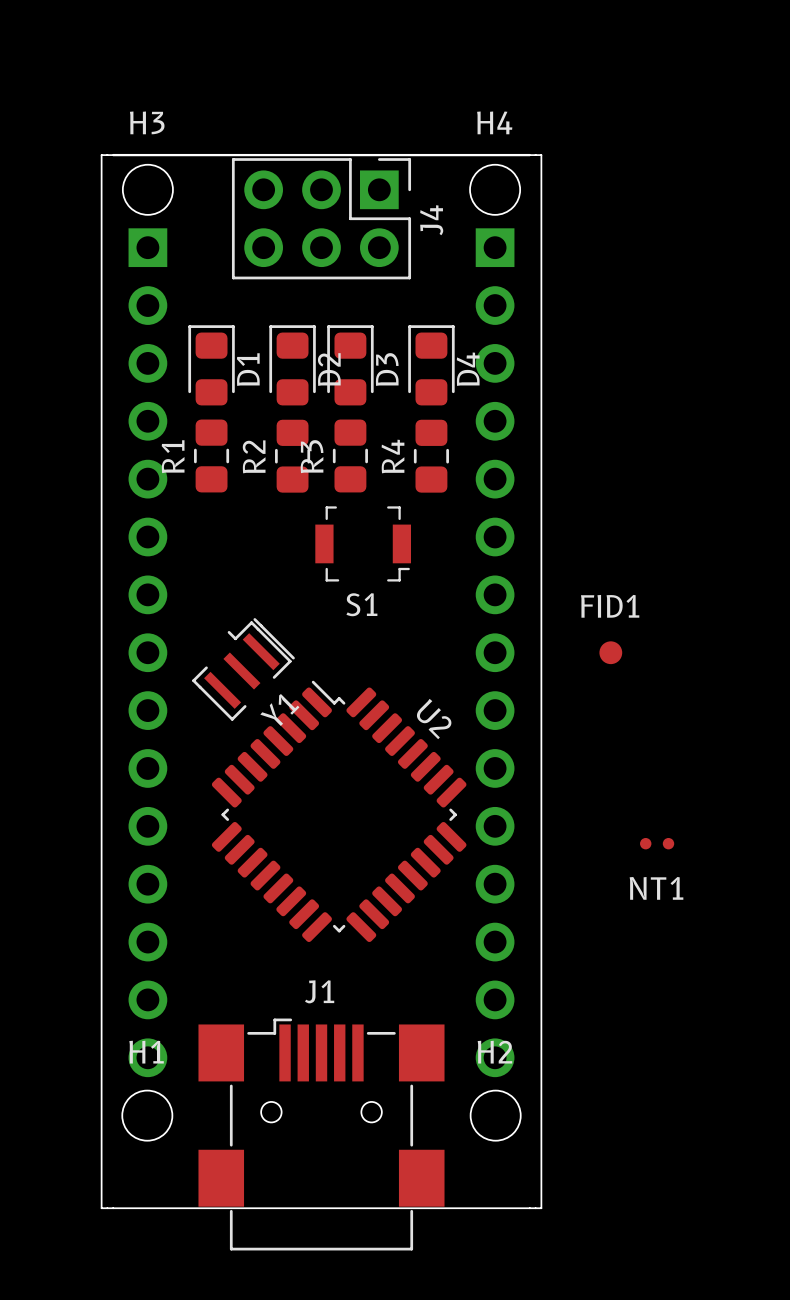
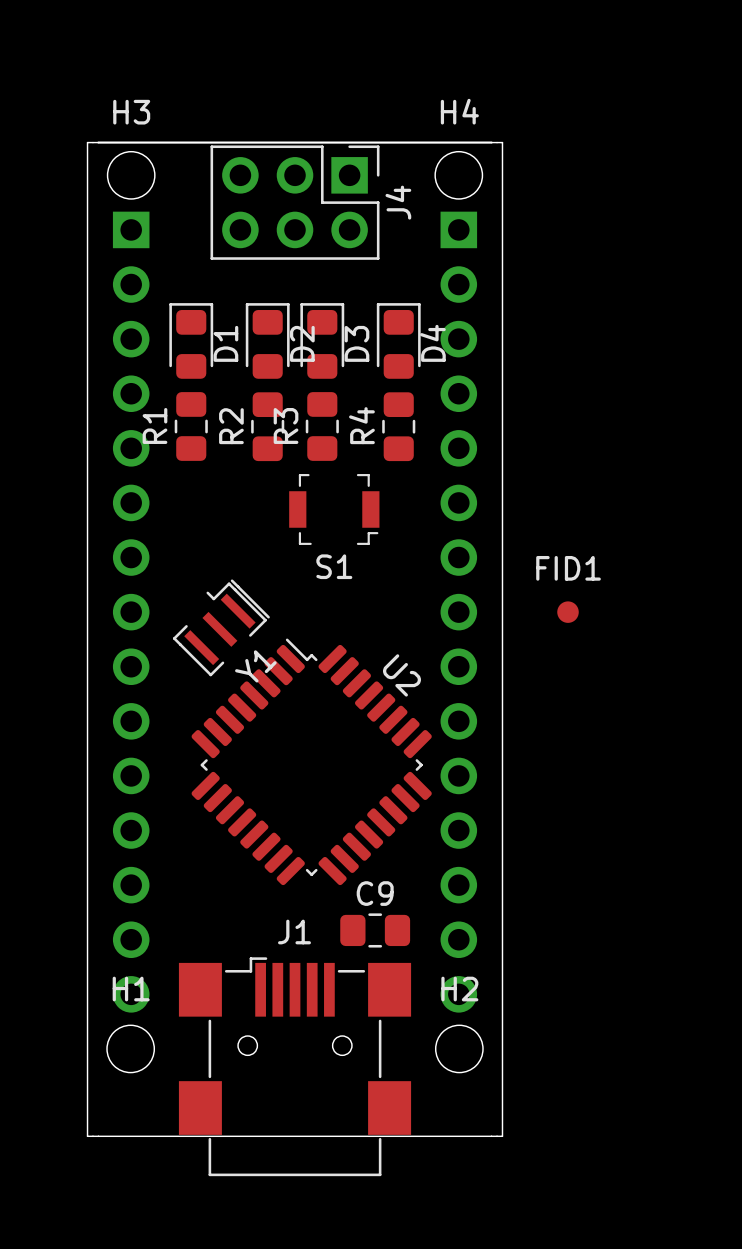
NT1: (657, 843) -> none
C9: none -> (375, 930)

